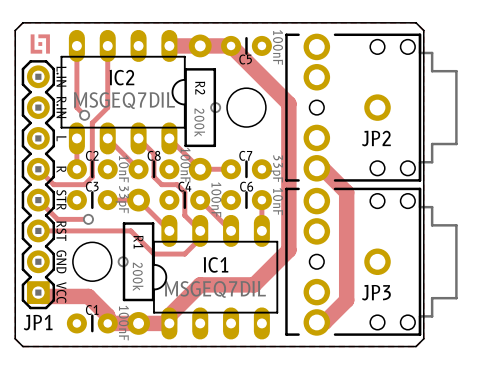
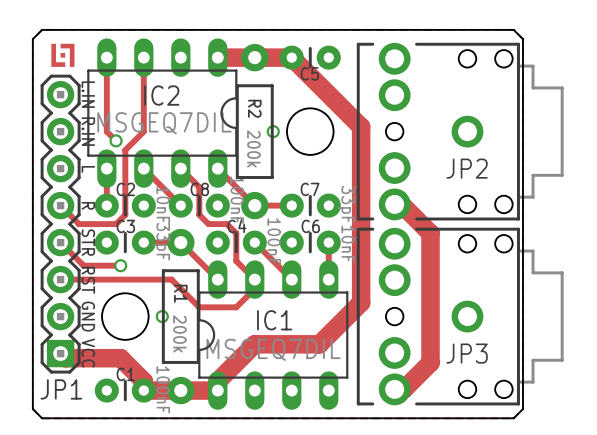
C5 value: 100nF (278, 47) -> none

